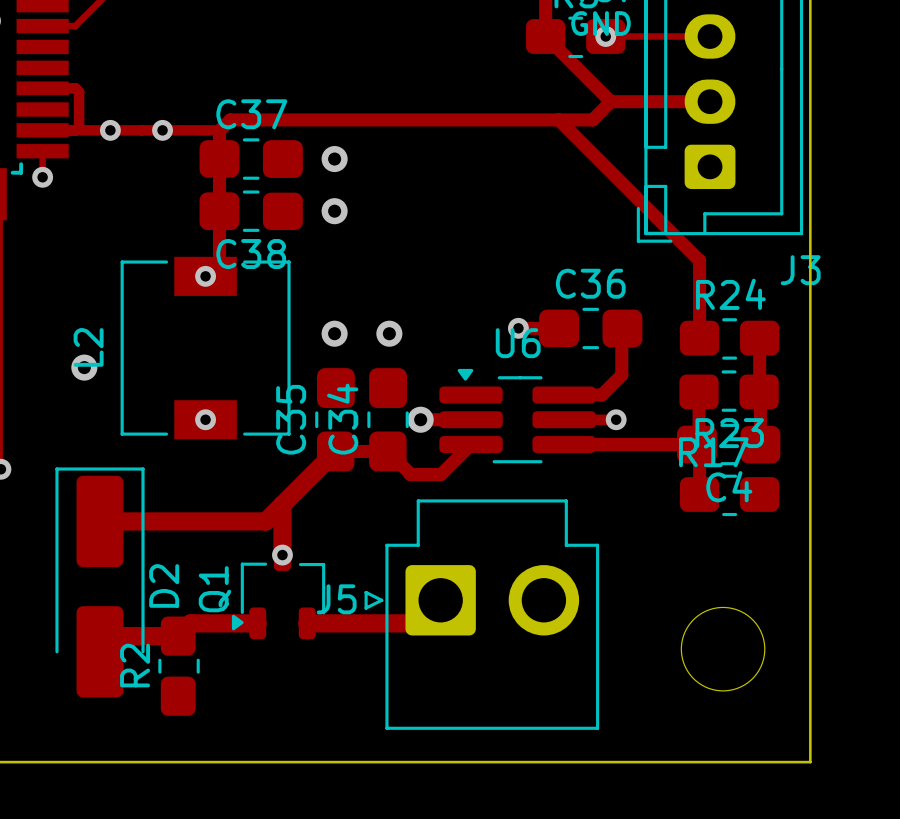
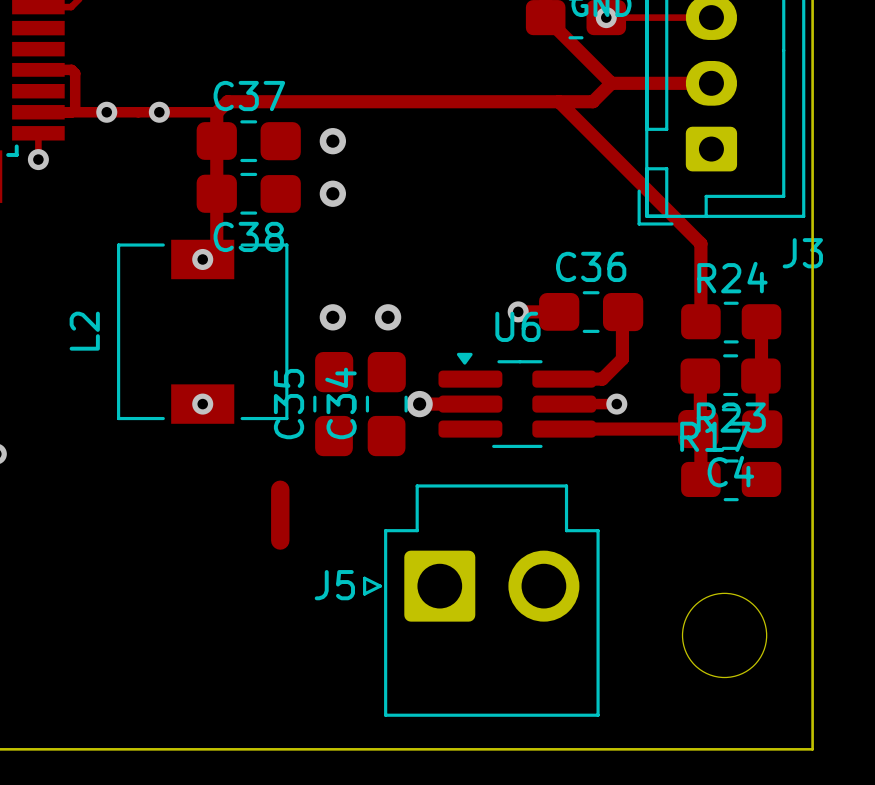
via: (84, 367) -> none
track: (471, 444) (441, 474) (410, 474) (387, 451) (335, 451) (265, 521) (99, 521) -> none
via: (282, 555) -> none
D2: (99, 582) -> none
Q1: (278, 589) -> none
track: (440, 600) (417, 623) (307, 623) -> none
track: (257, 623) (190, 623) (178, 636) (115, 636) (99, 651) -> none
R2: (179, 666) -> none

